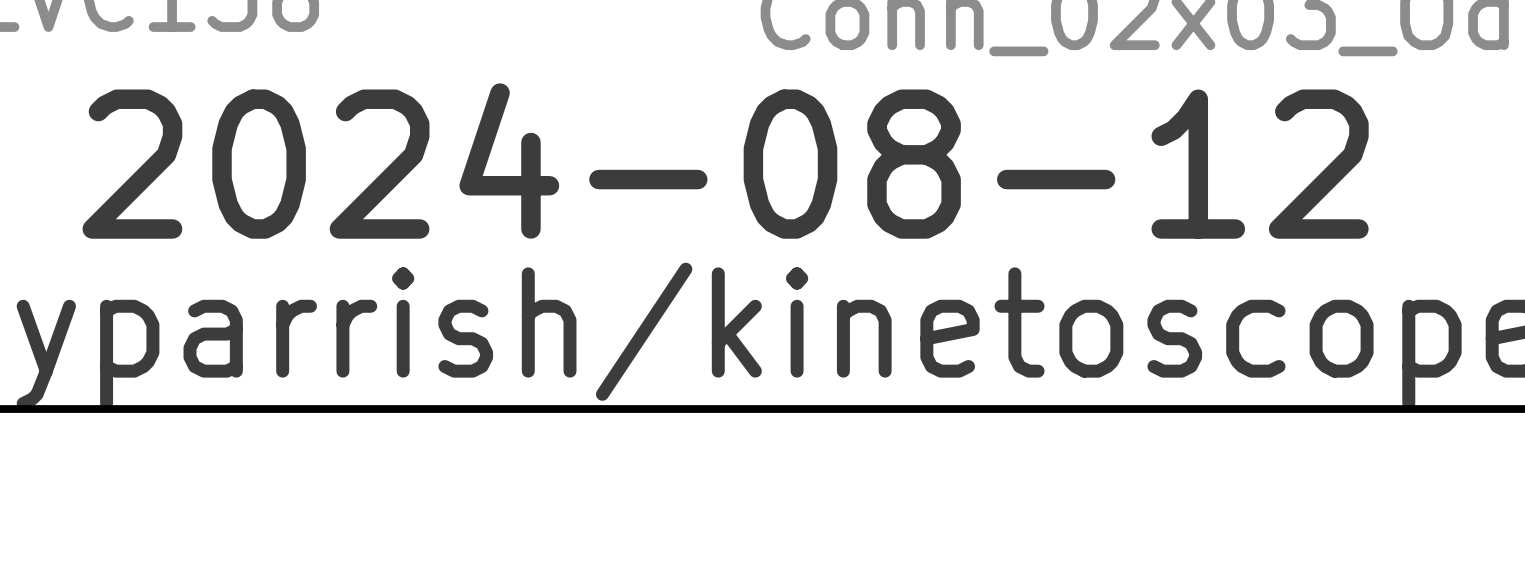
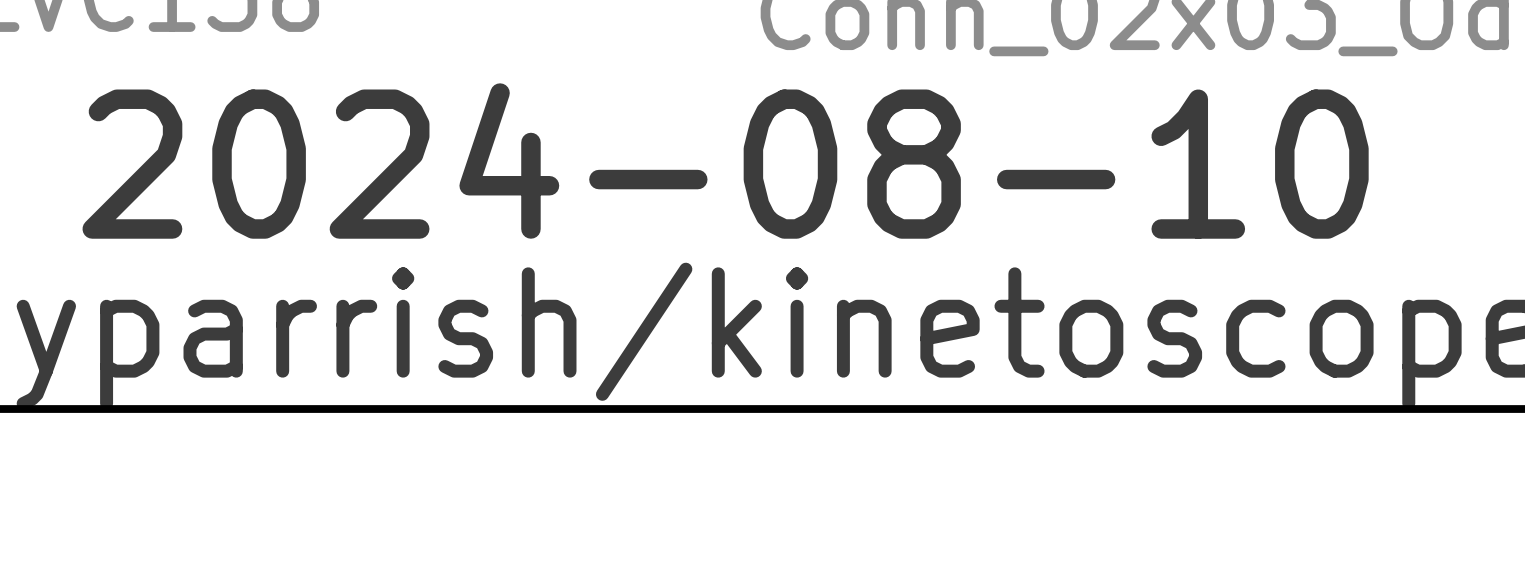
text: 2024-08-12 (725, 161) -> 2024-08-10 (725, 161)

